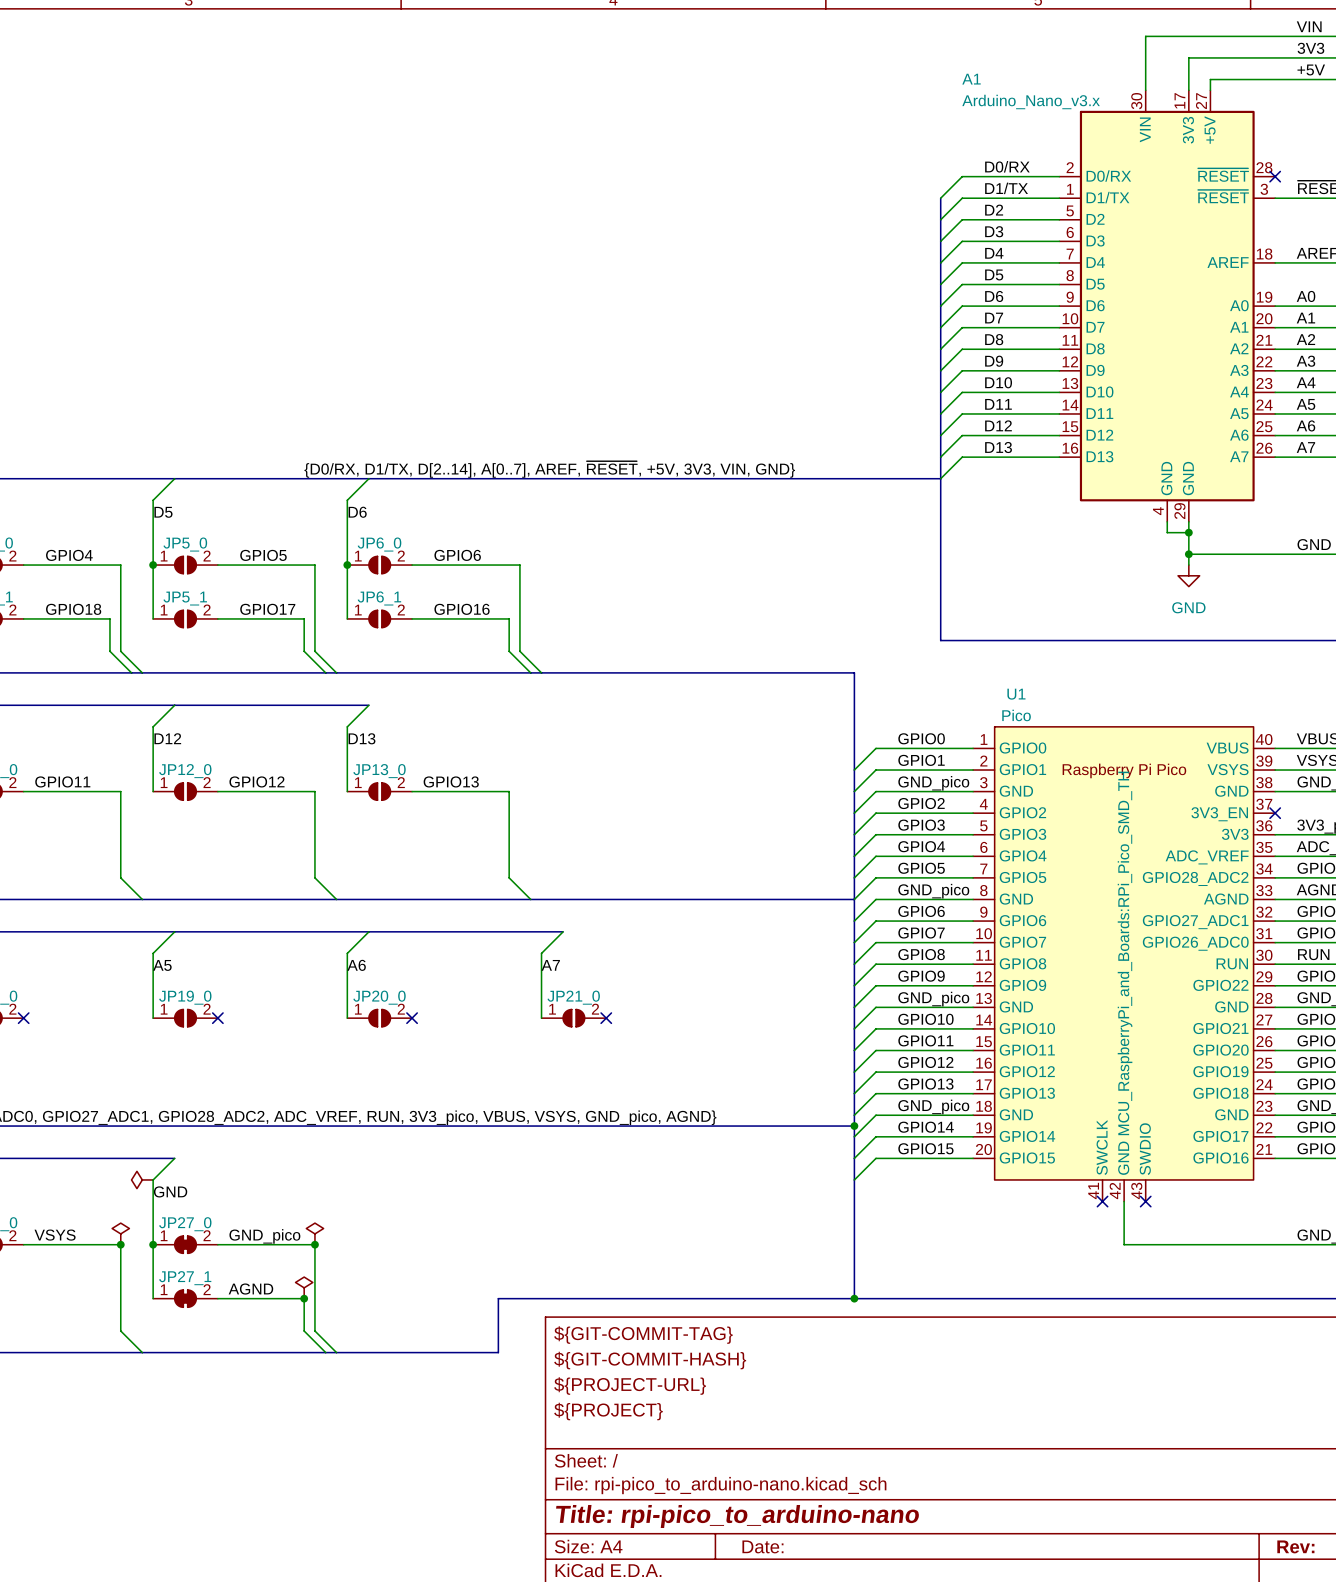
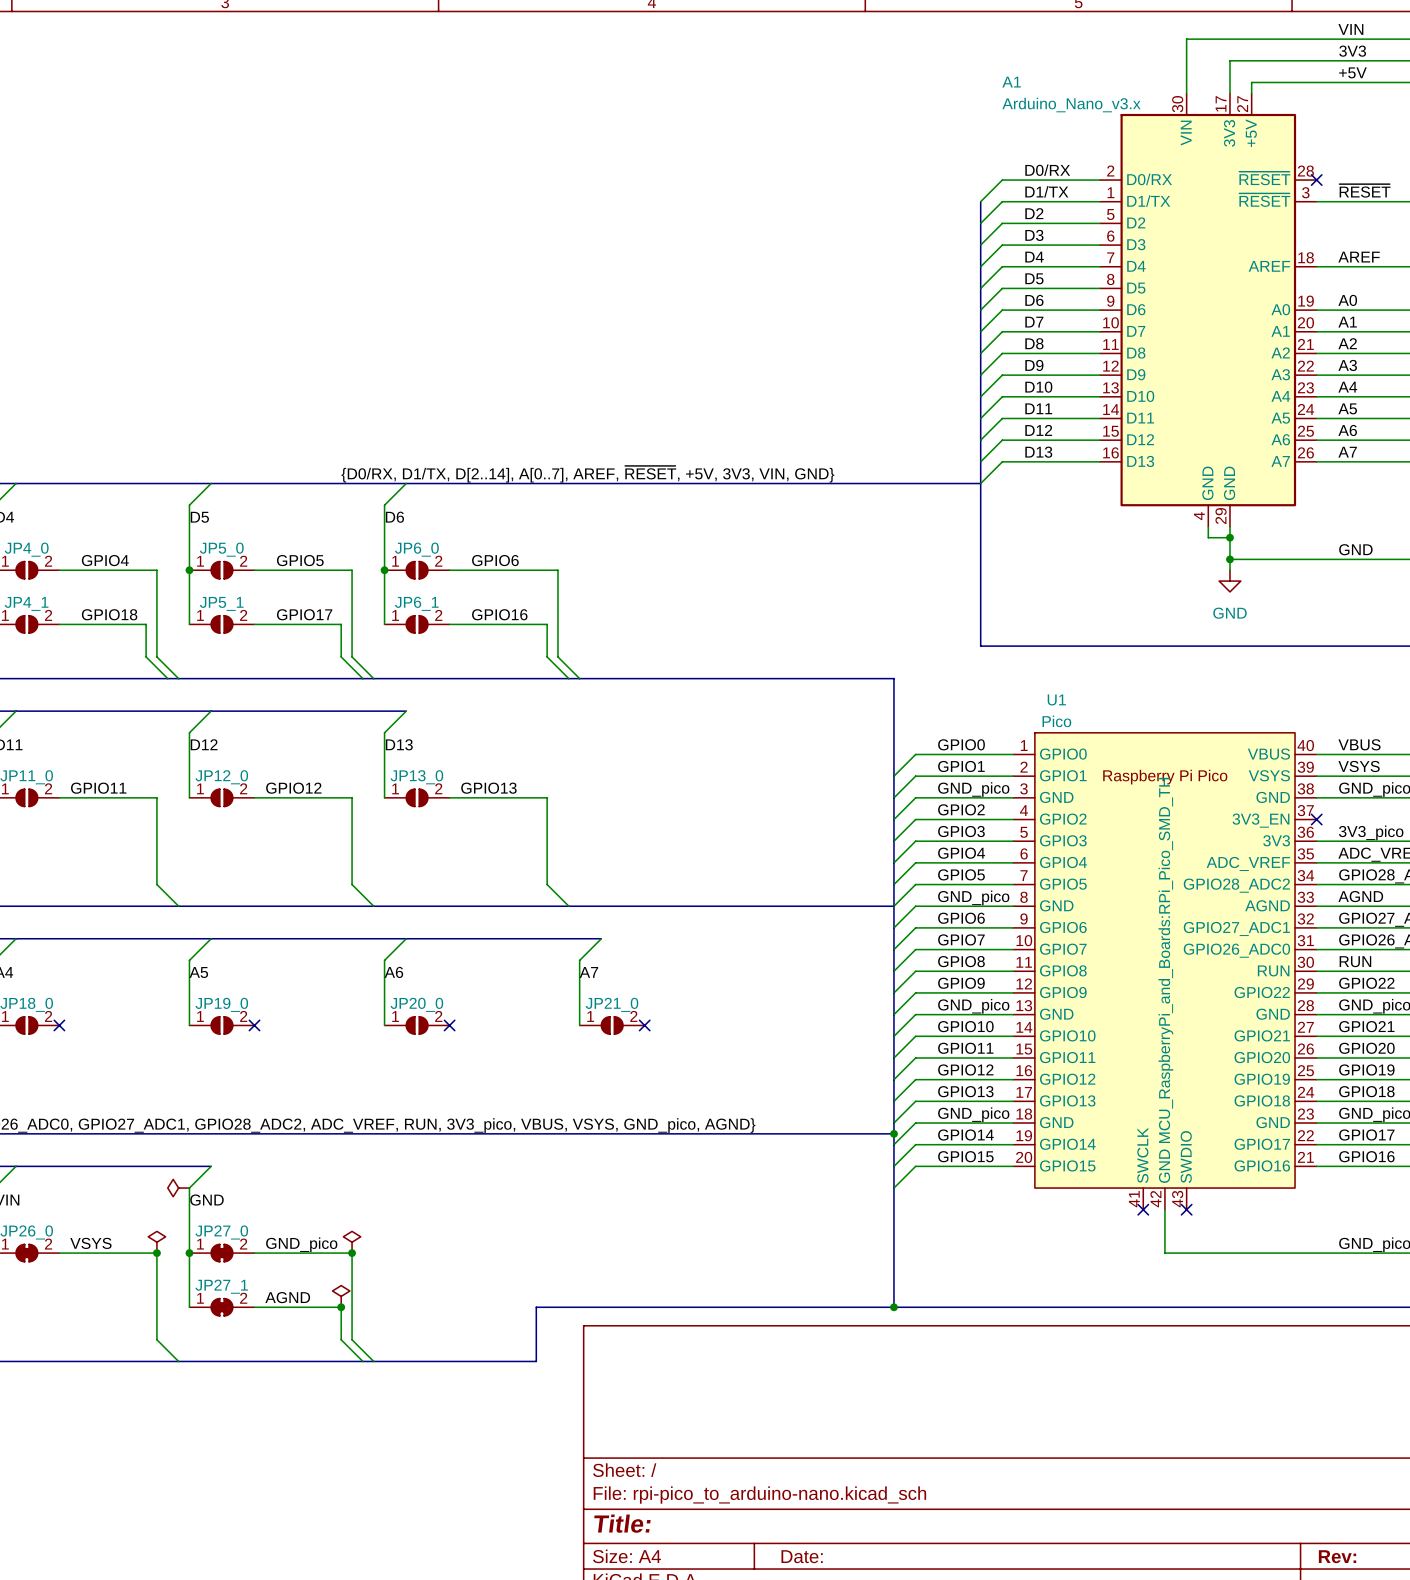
title block: ${GIT-COMMIT-TAG} (643, 1335) -> none
title block: ${GIT-COMMIT-HASH} (650, 1360) -> none
title block: ${PROJECT-URL} (630, 1386) -> none
title block: ${PROJECT} (608, 1411) -> none
title block: Title: rpi-pico_to_arduino-nano (737, 1516) -> Title: (622, 1523)

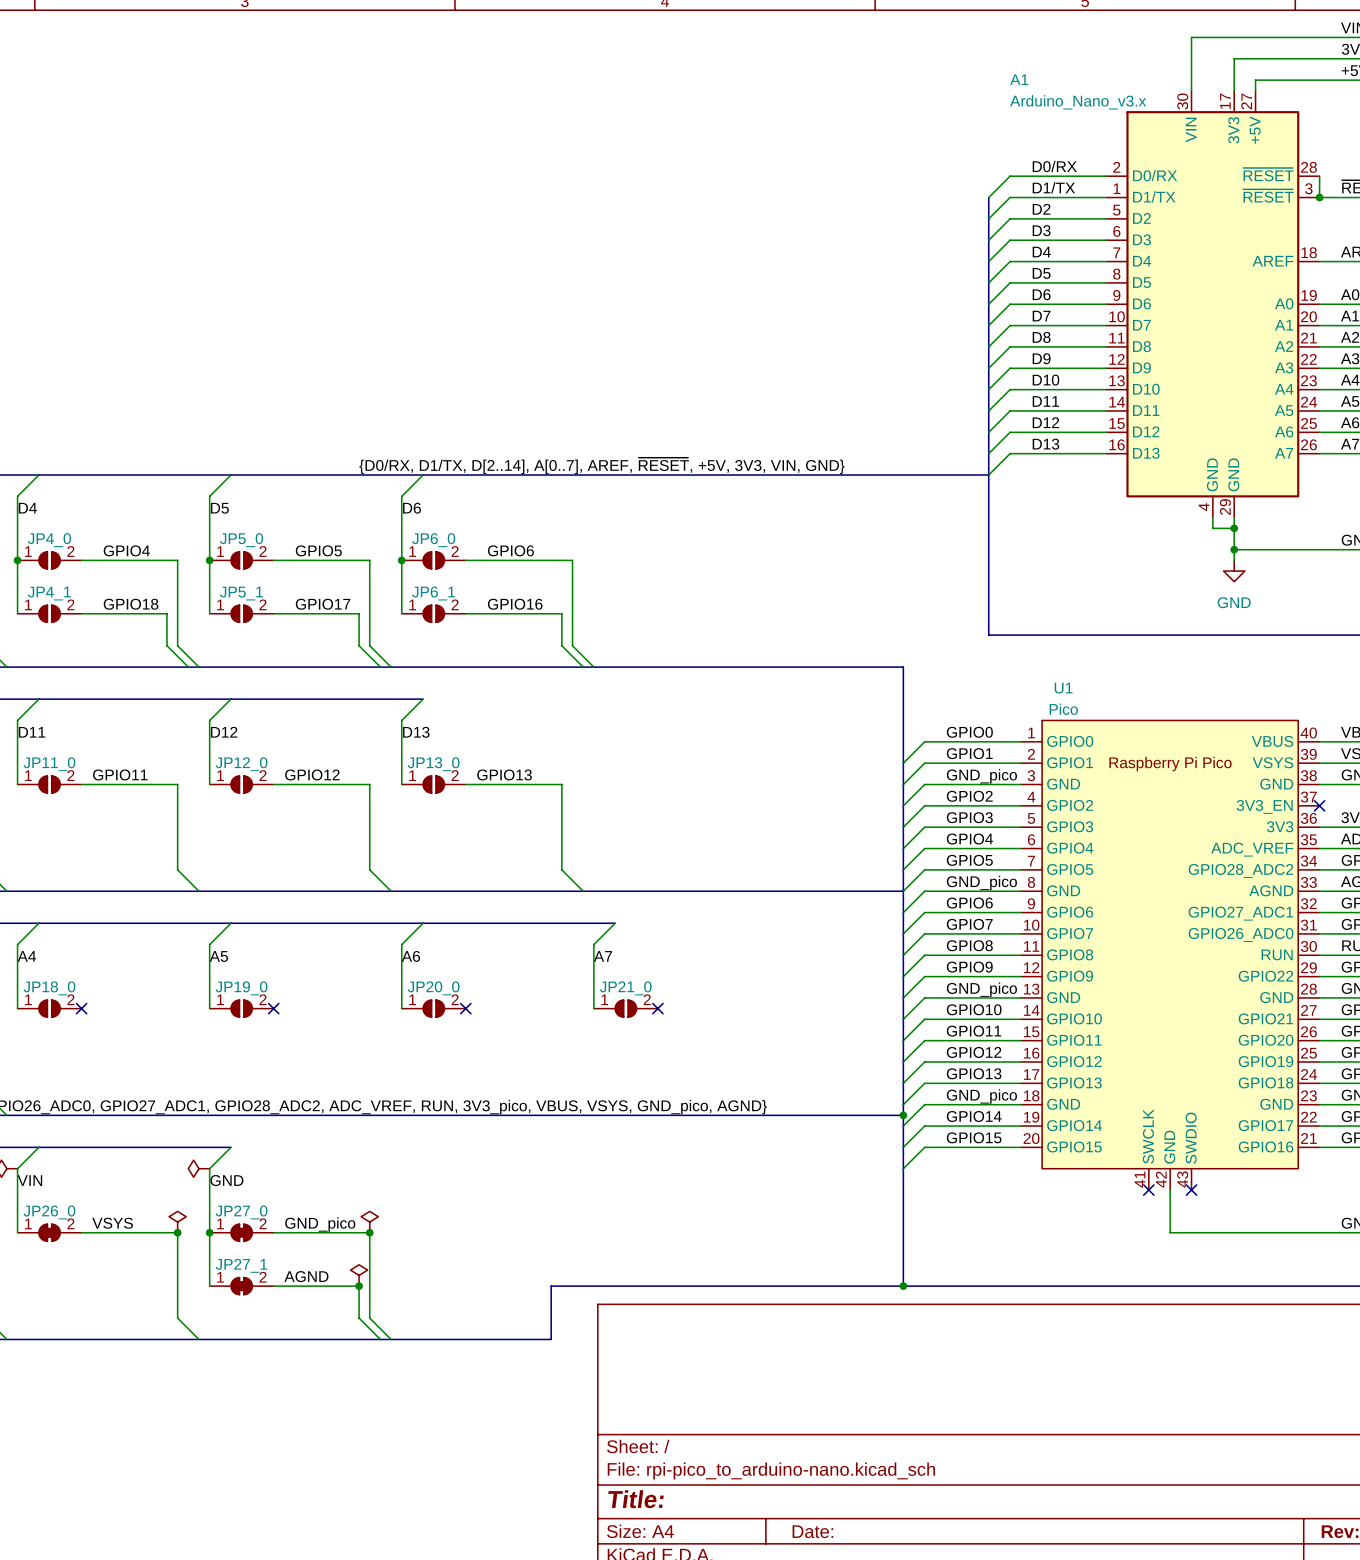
wire: none -> (1319, 176) (1319, 197)
no-connect mark: (1316, 180) -> none
junction: none -> (1319, 197)
U1 text: MCU_RaspberryPi_and_Boards:RPi_Pico_SMD_TH (1165, 960) -> none

